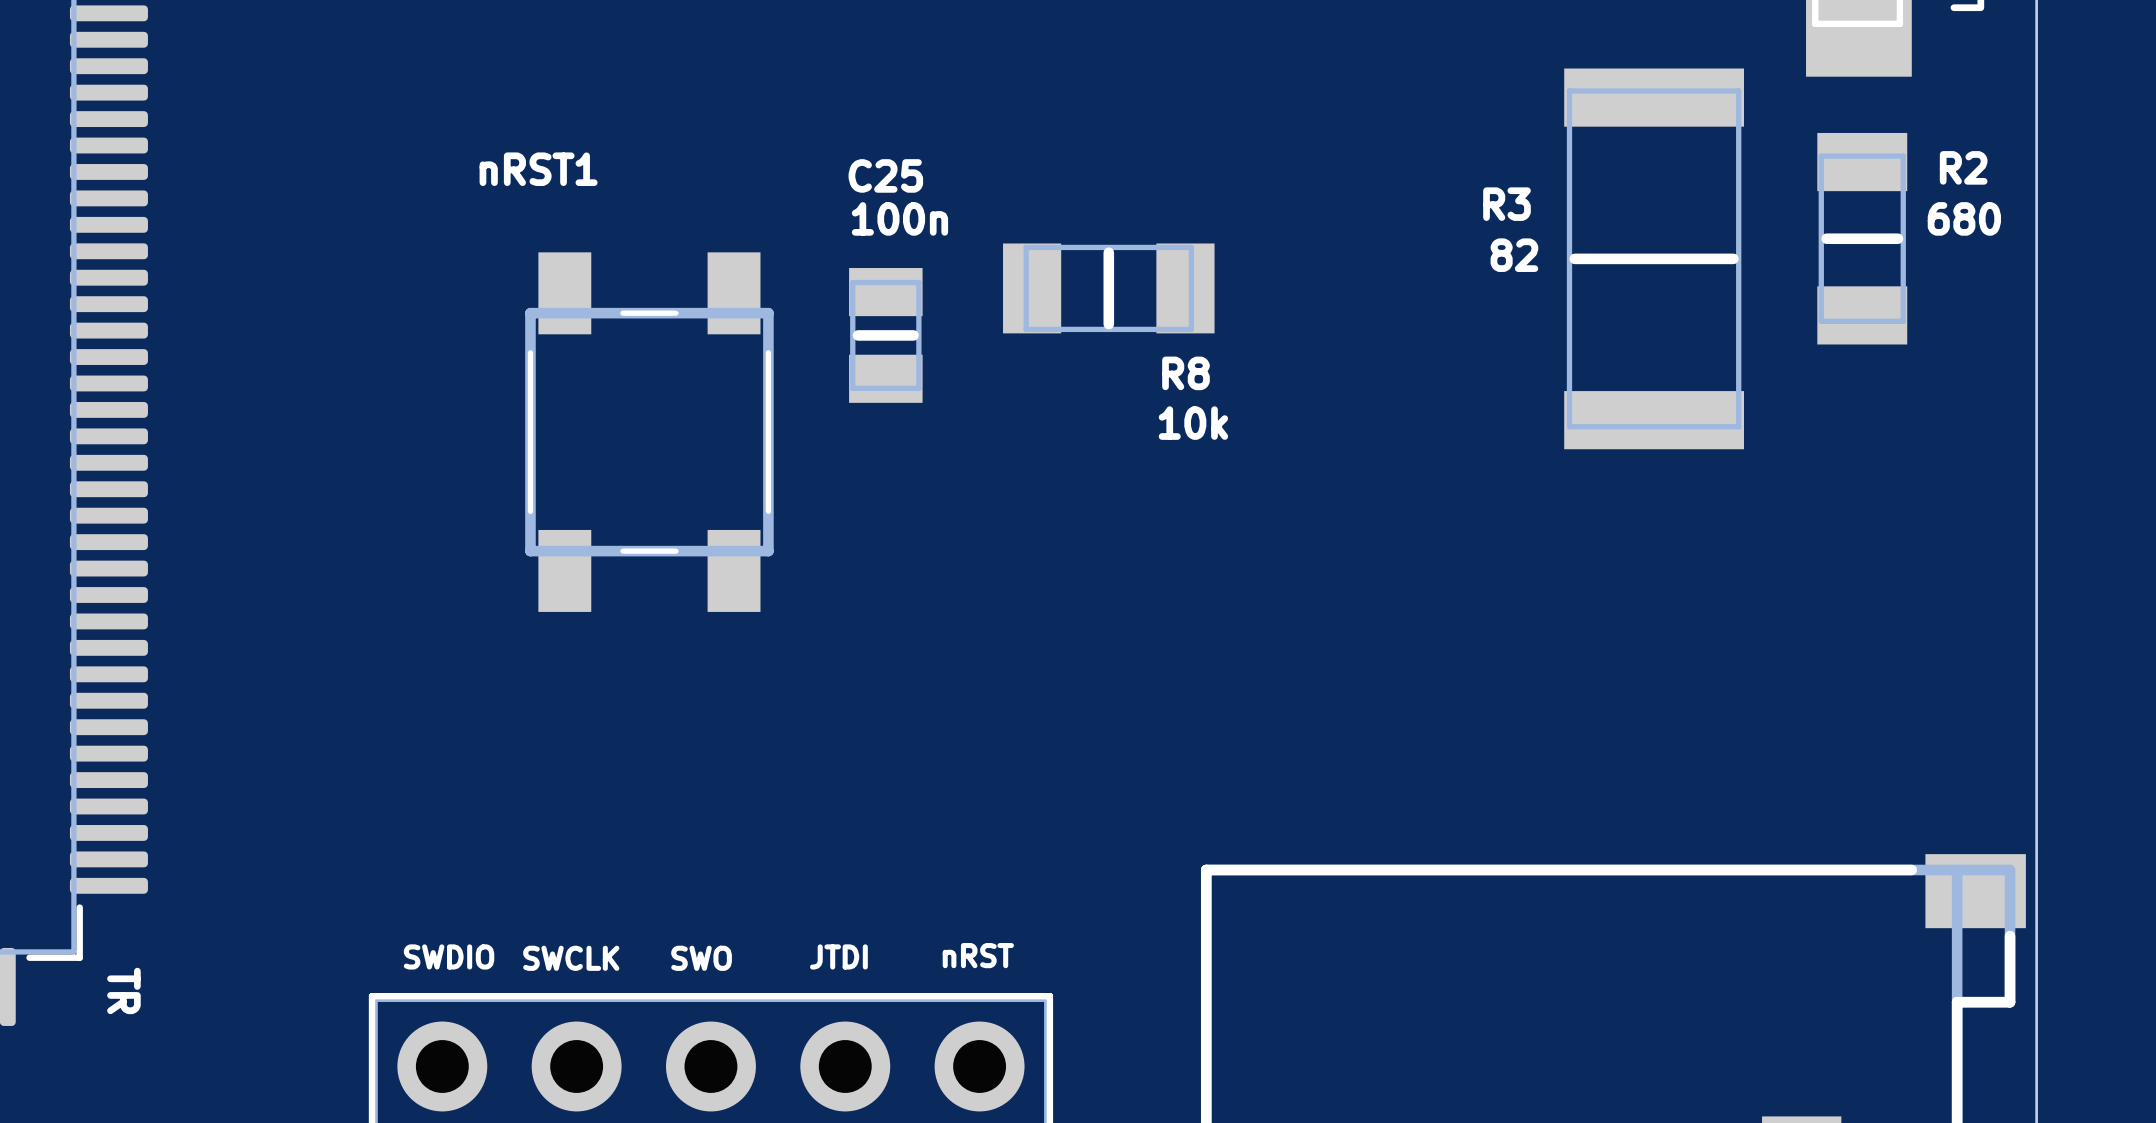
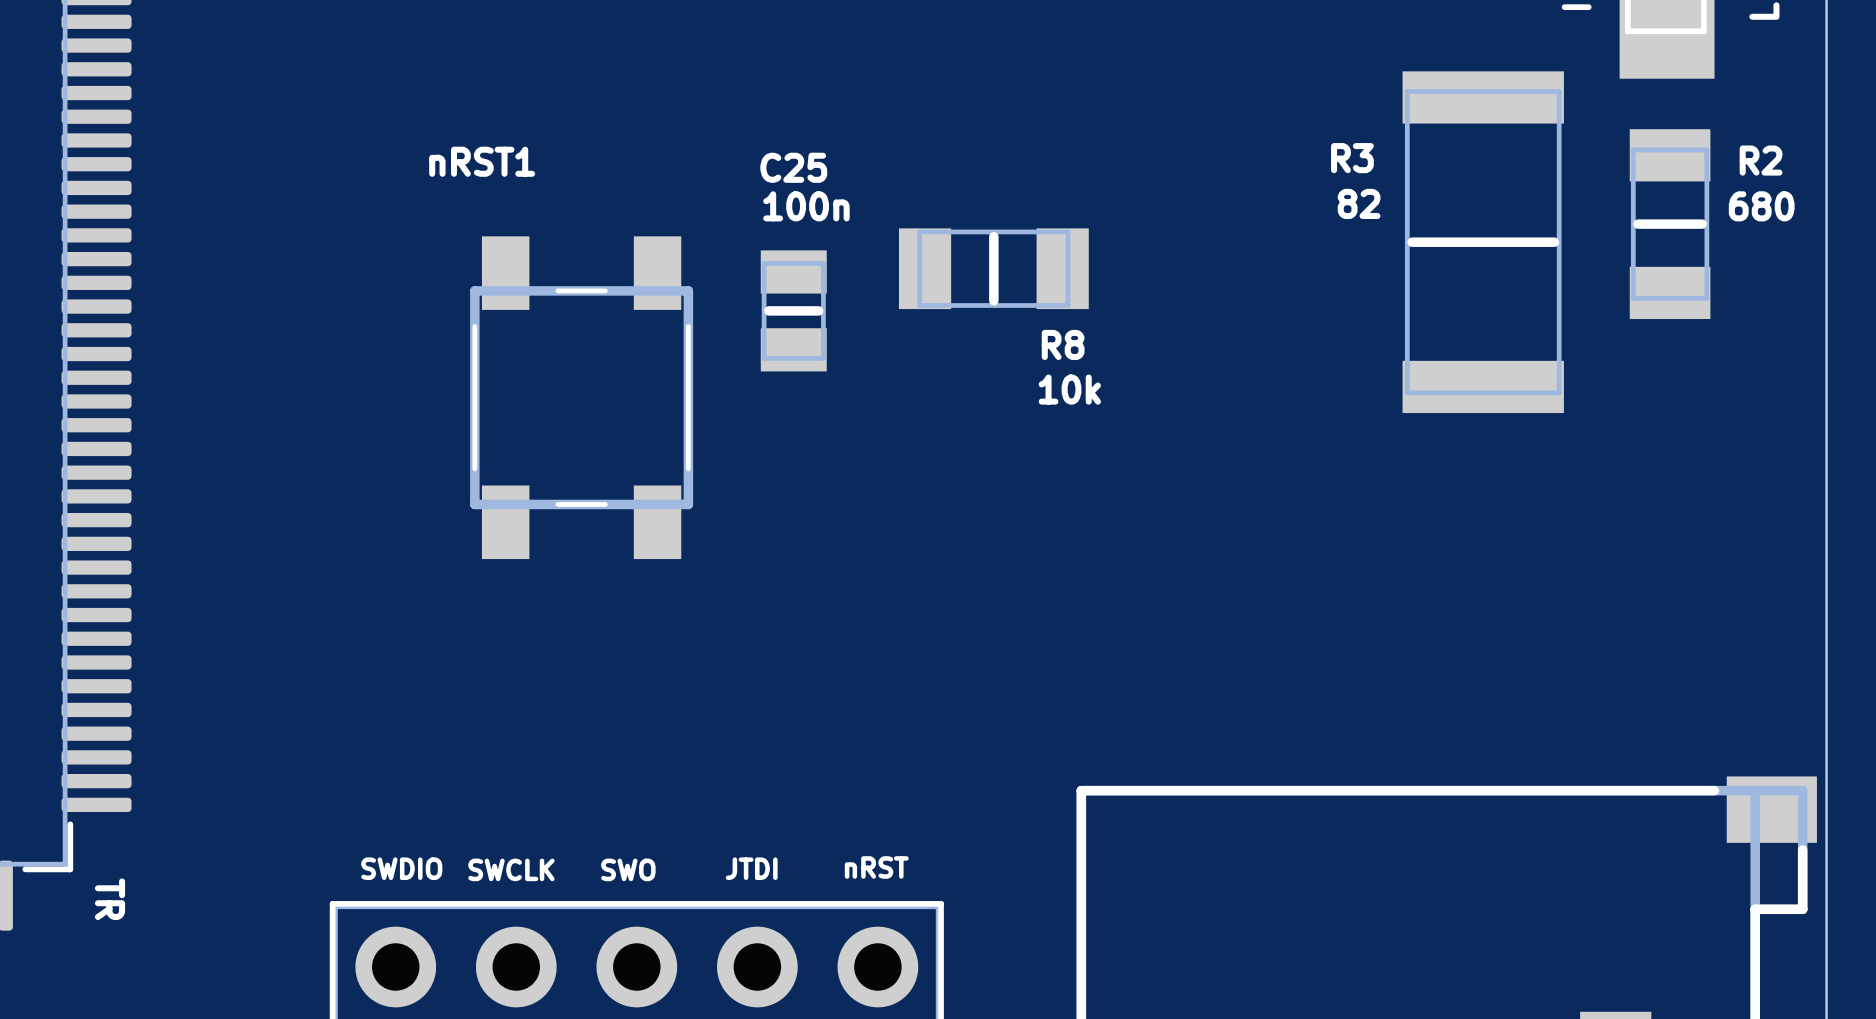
R3 name position: R3 (1506, 204) -> R3 (1352, 158)
R3 value position: 82 (1514, 255) -> 82 (1359, 203)

